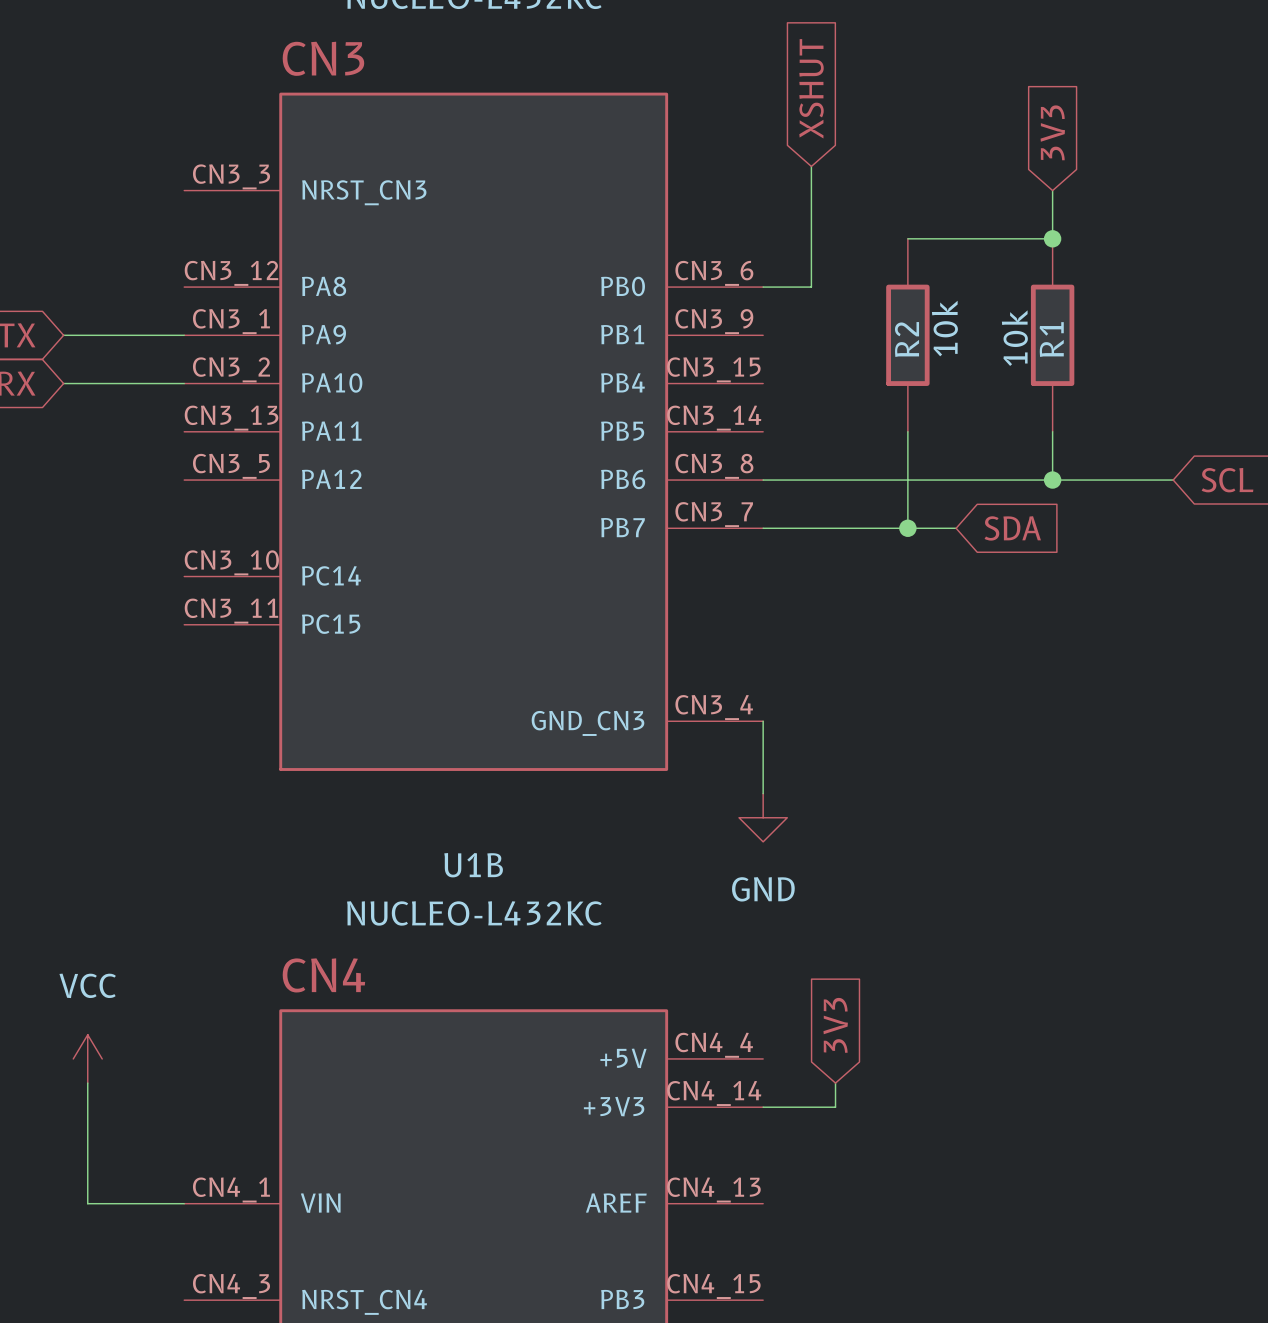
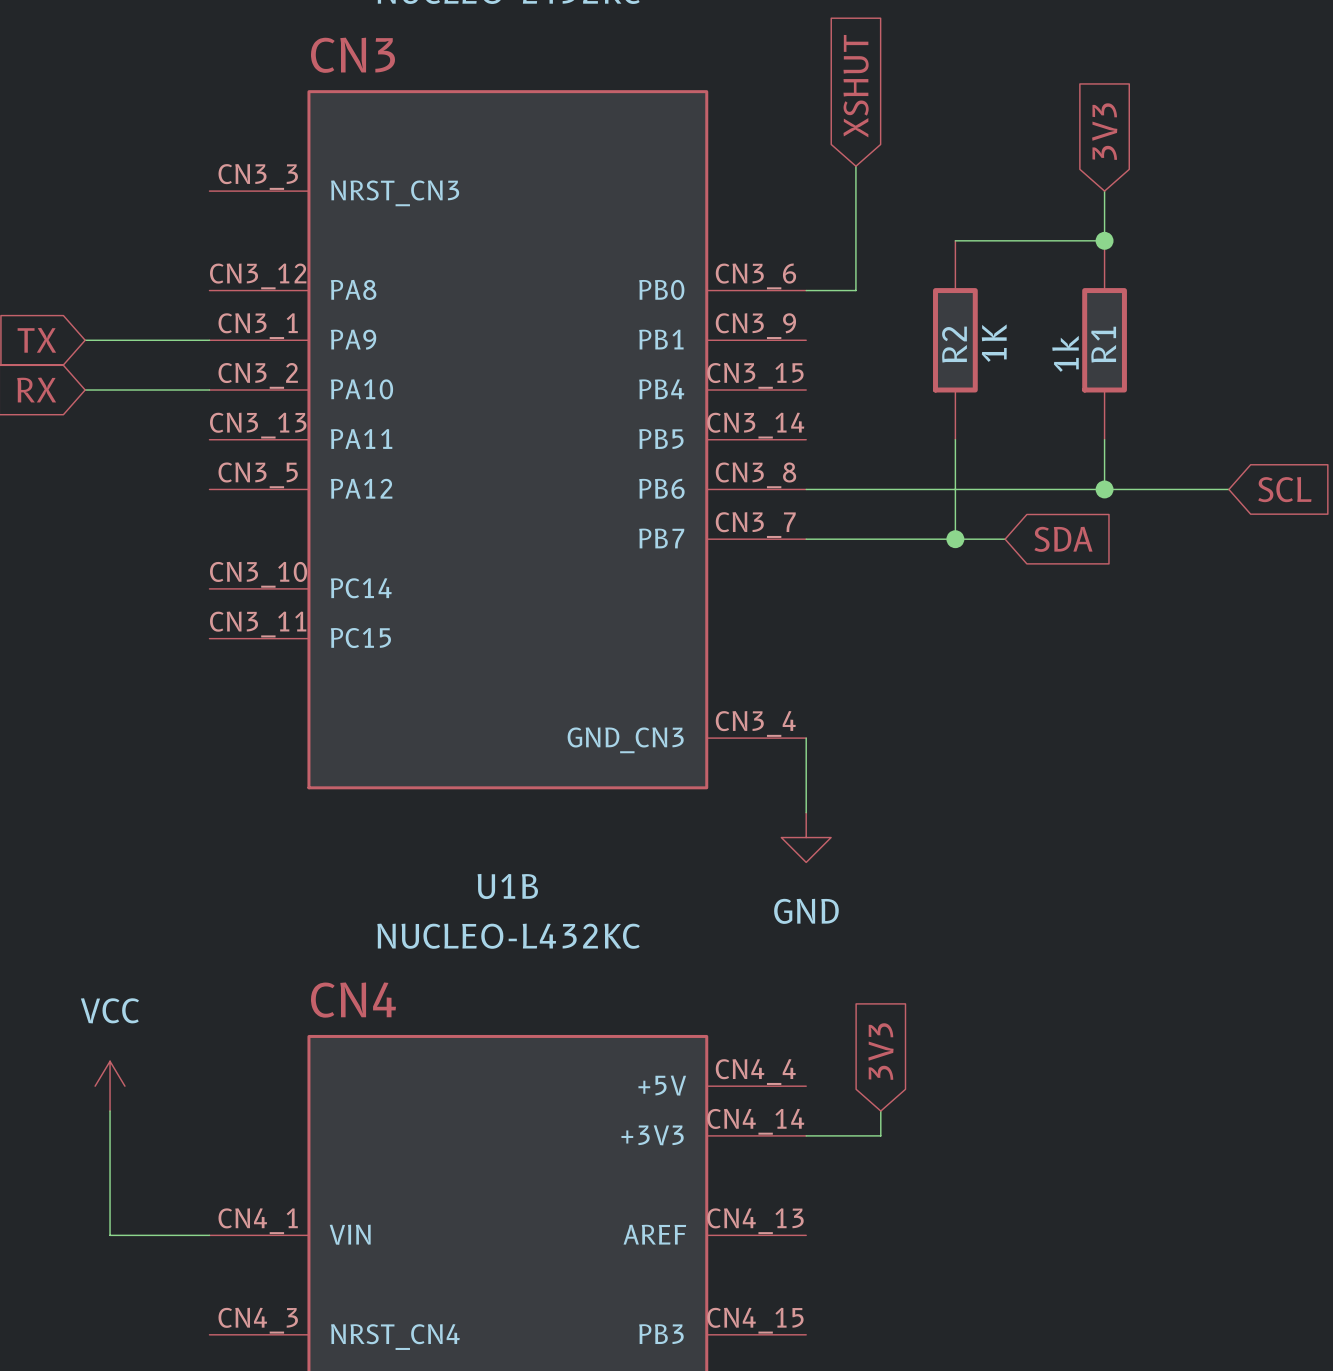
R2 value: 10k (944, 328) -> 1K (994, 343)
R1 value: 10k (1014, 338) -> 1k (1065, 353)

